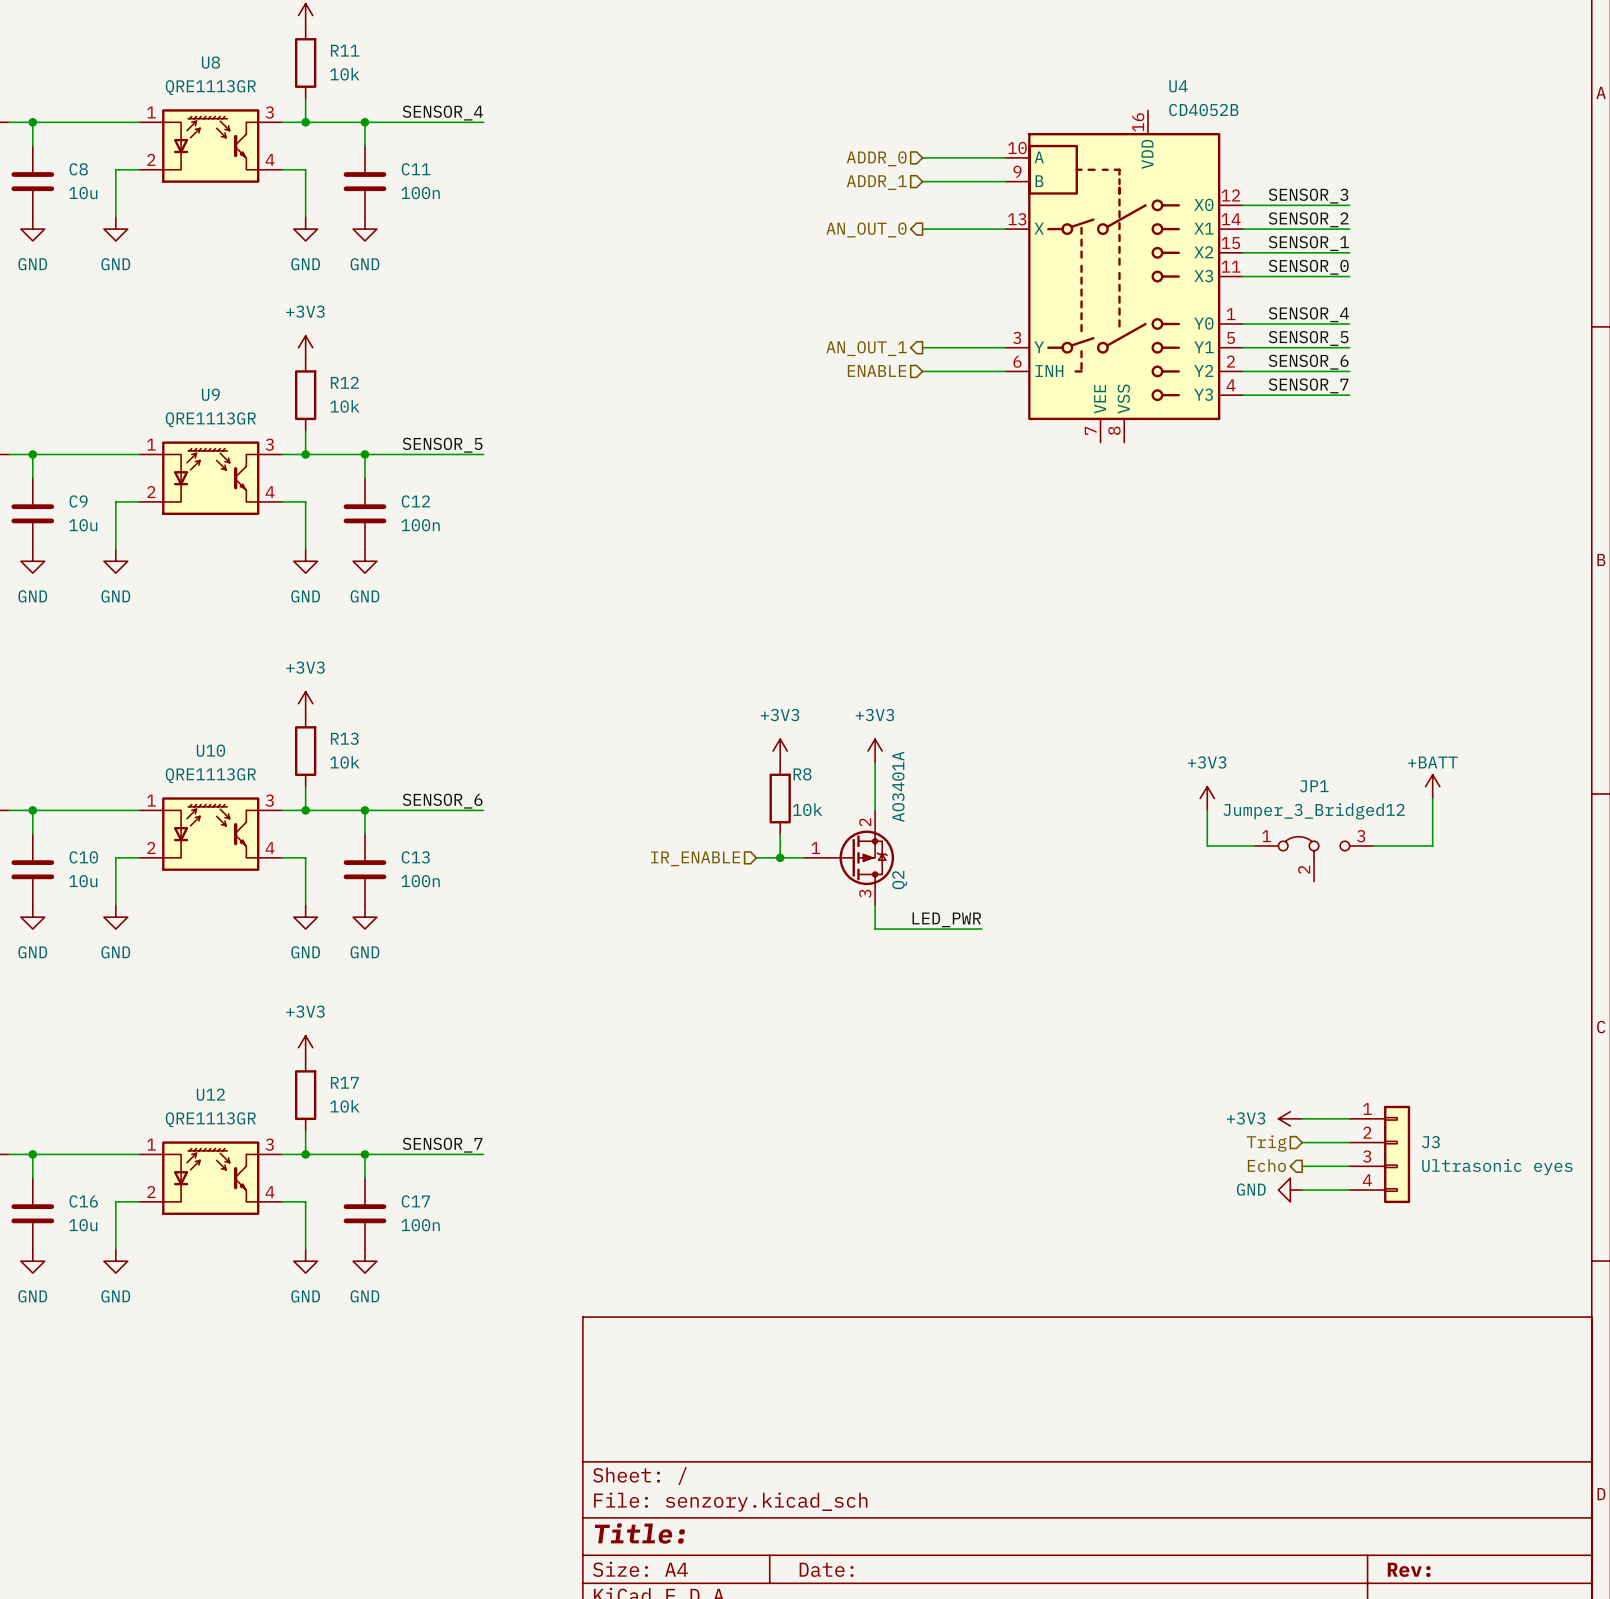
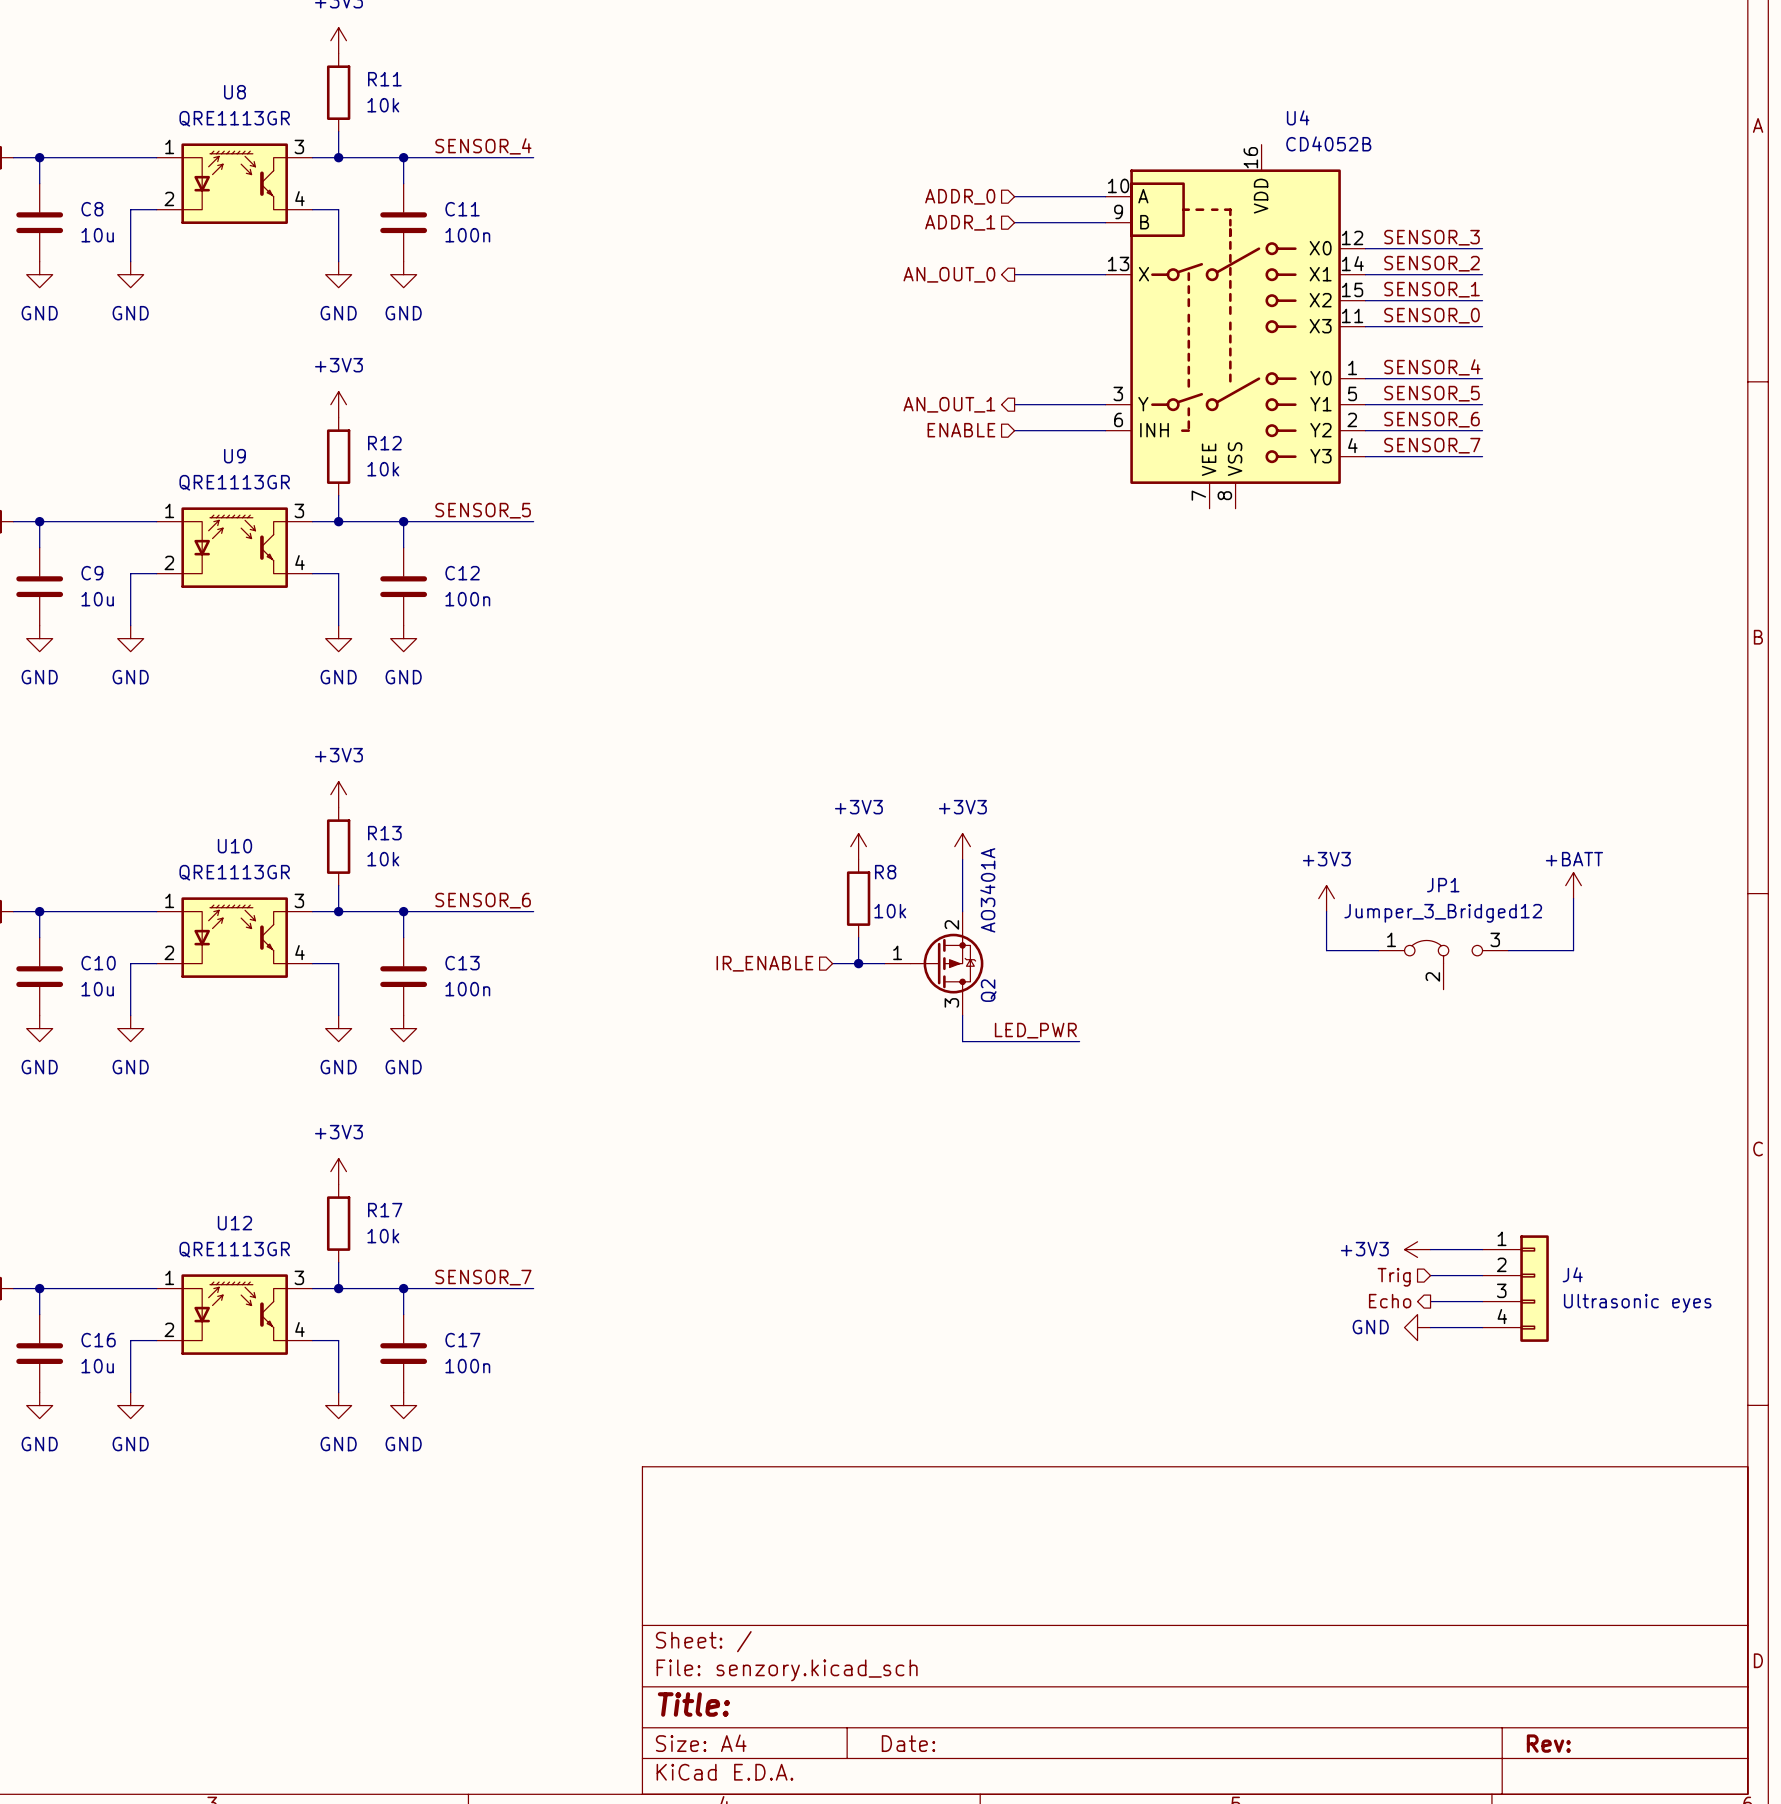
J3 name: J3 (1430, 1142) -> J4 (1572, 1274)

